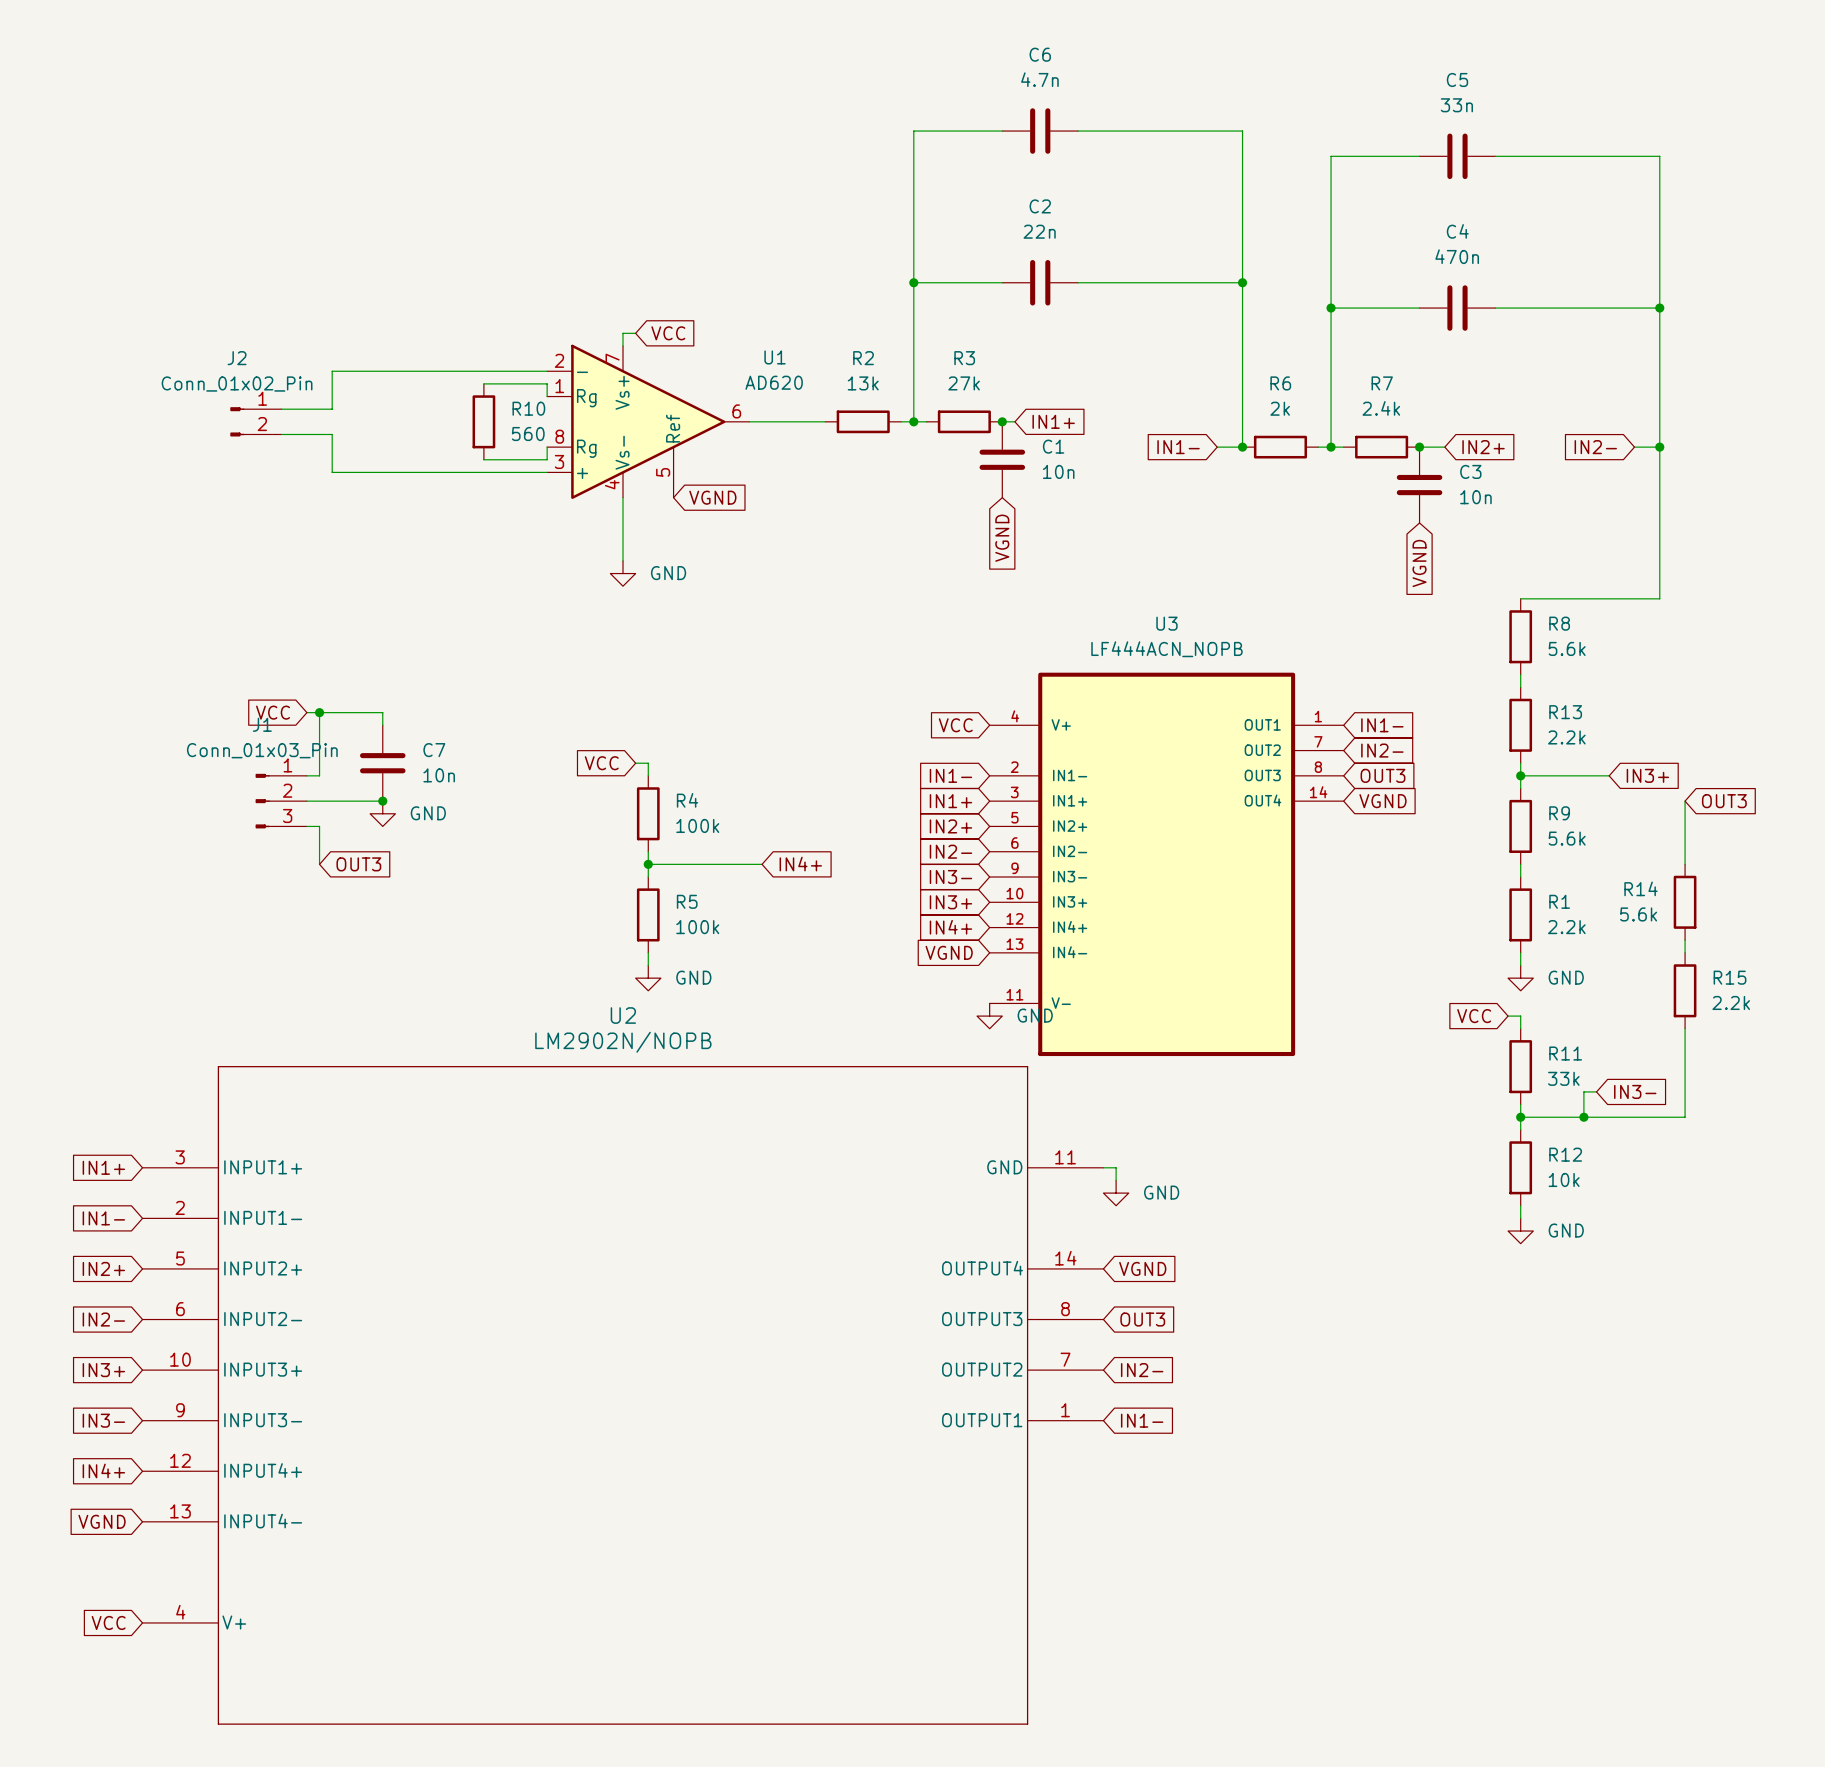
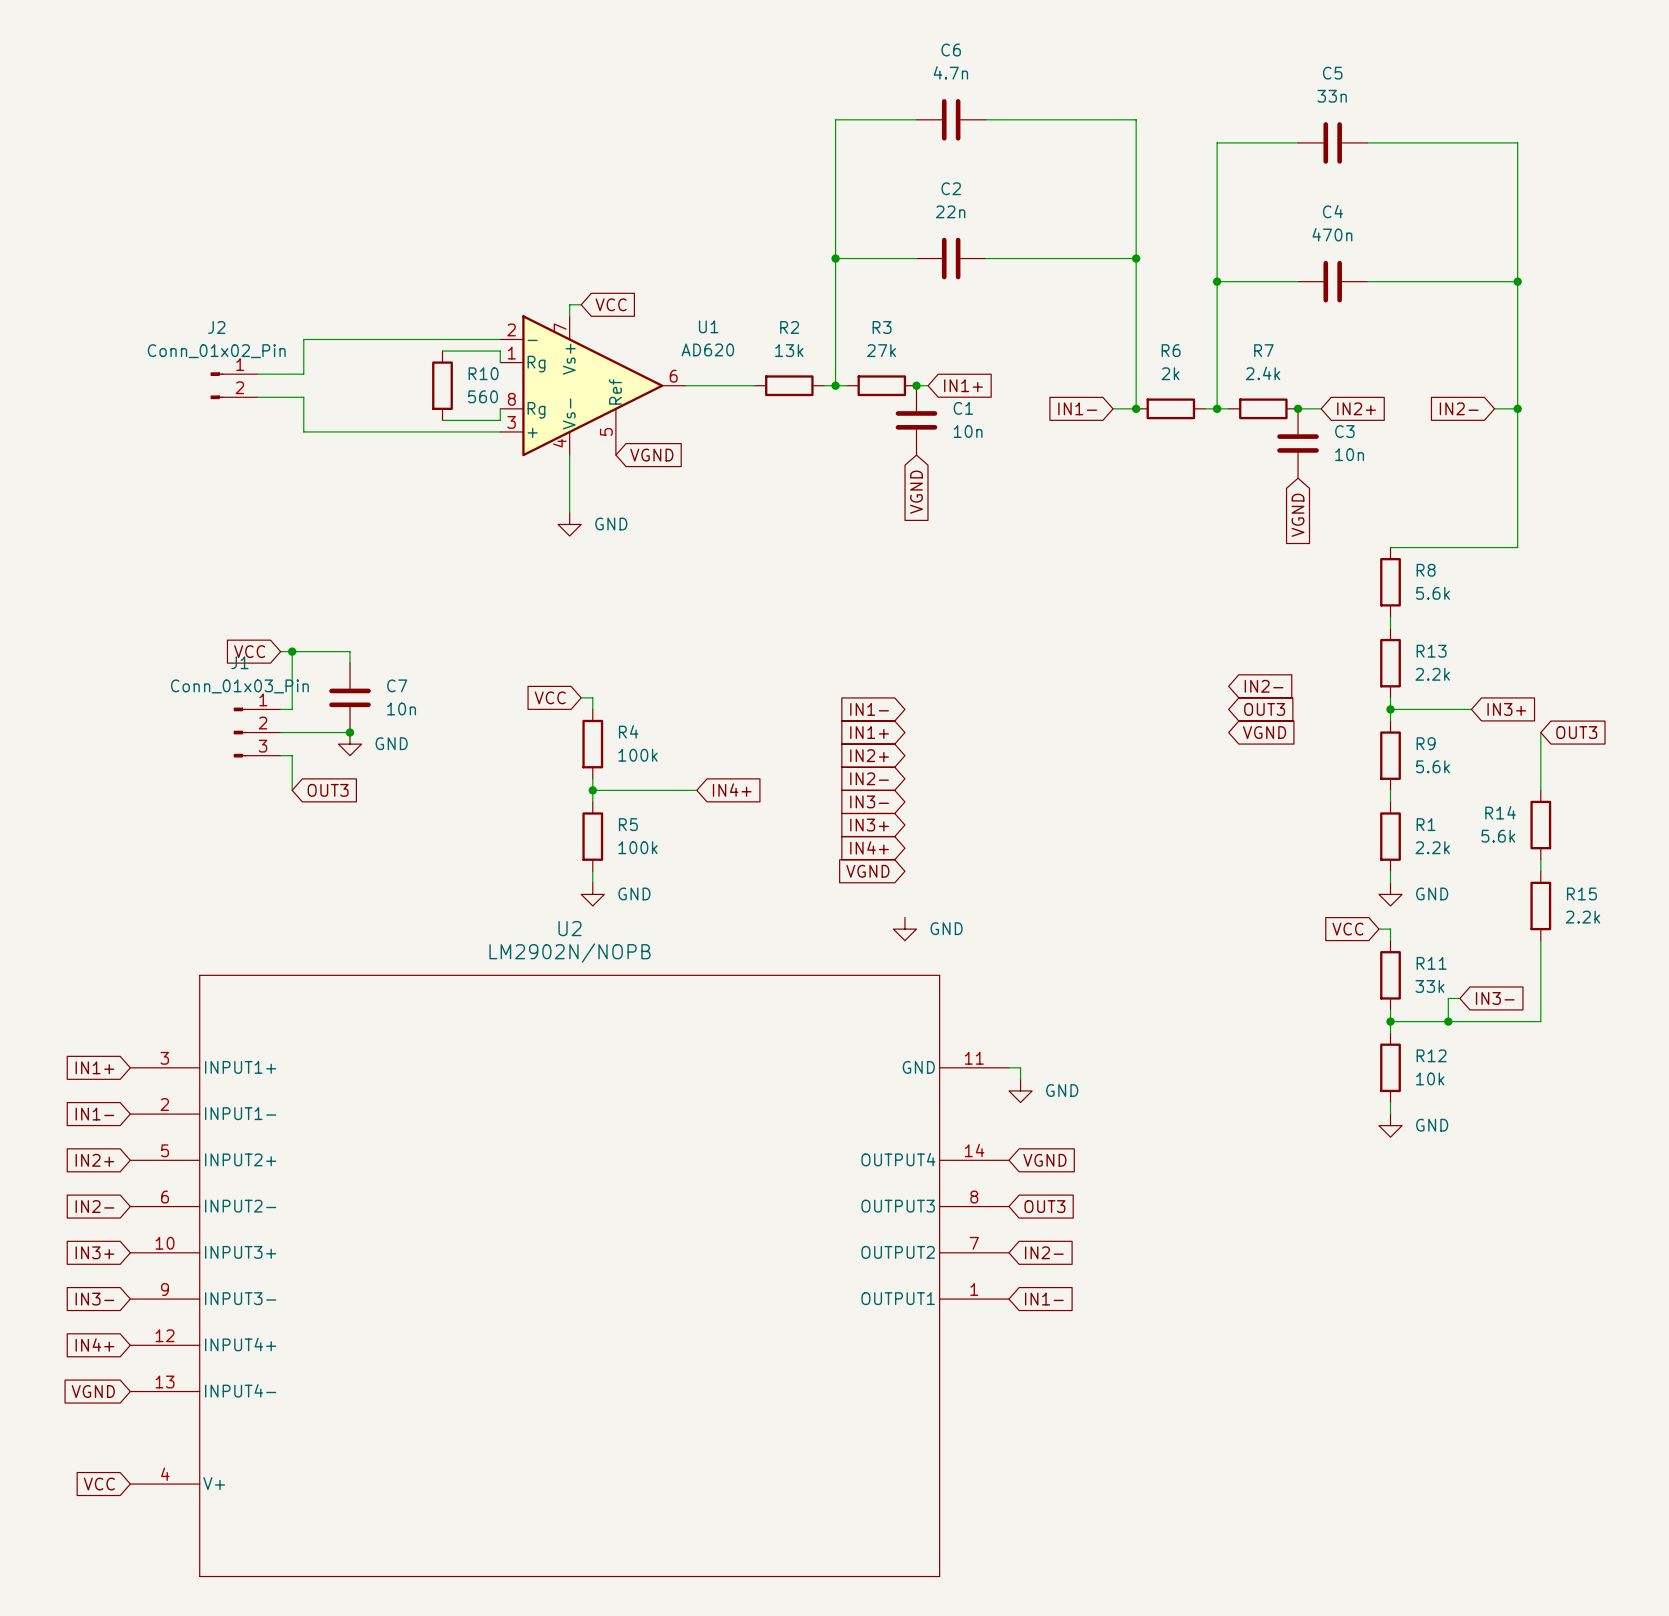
global label: VCC (955, 725) -> none
global label: IN1- (1382, 725) -> none
U3: LF444ACN_NOPB (1166, 864) -> none

